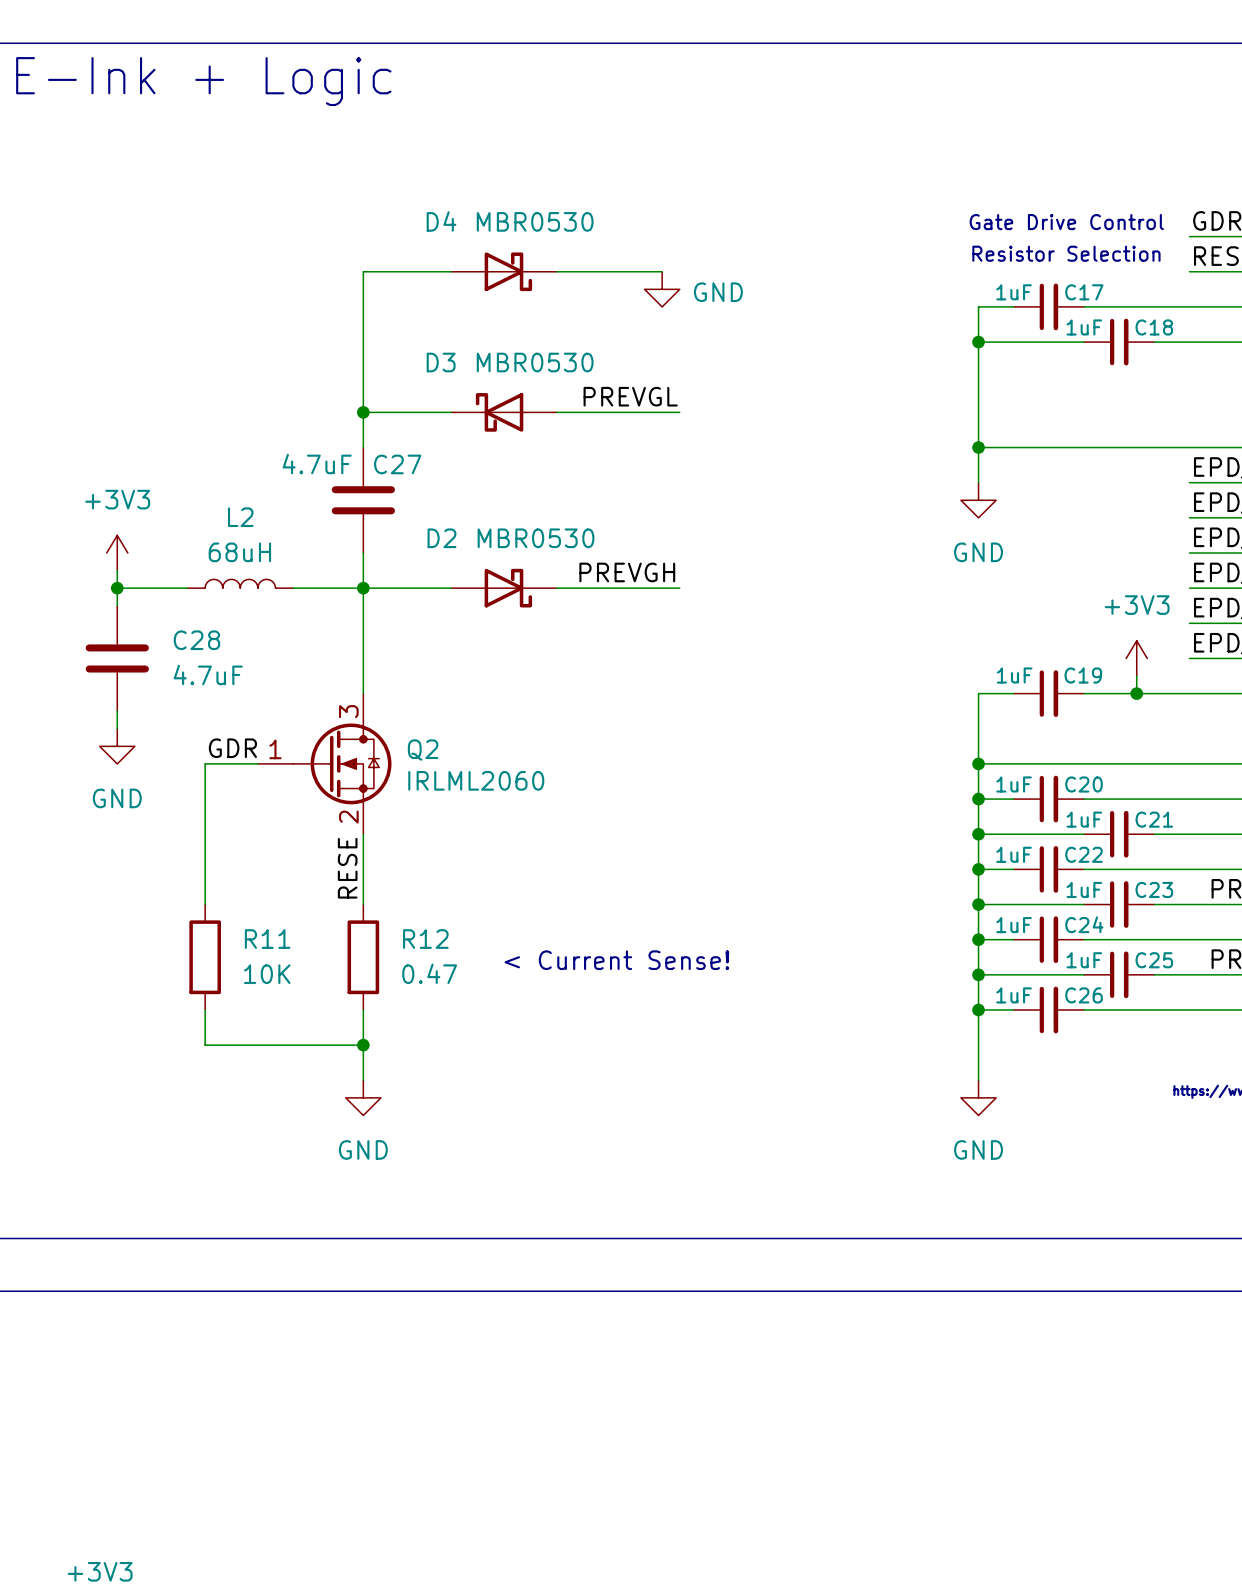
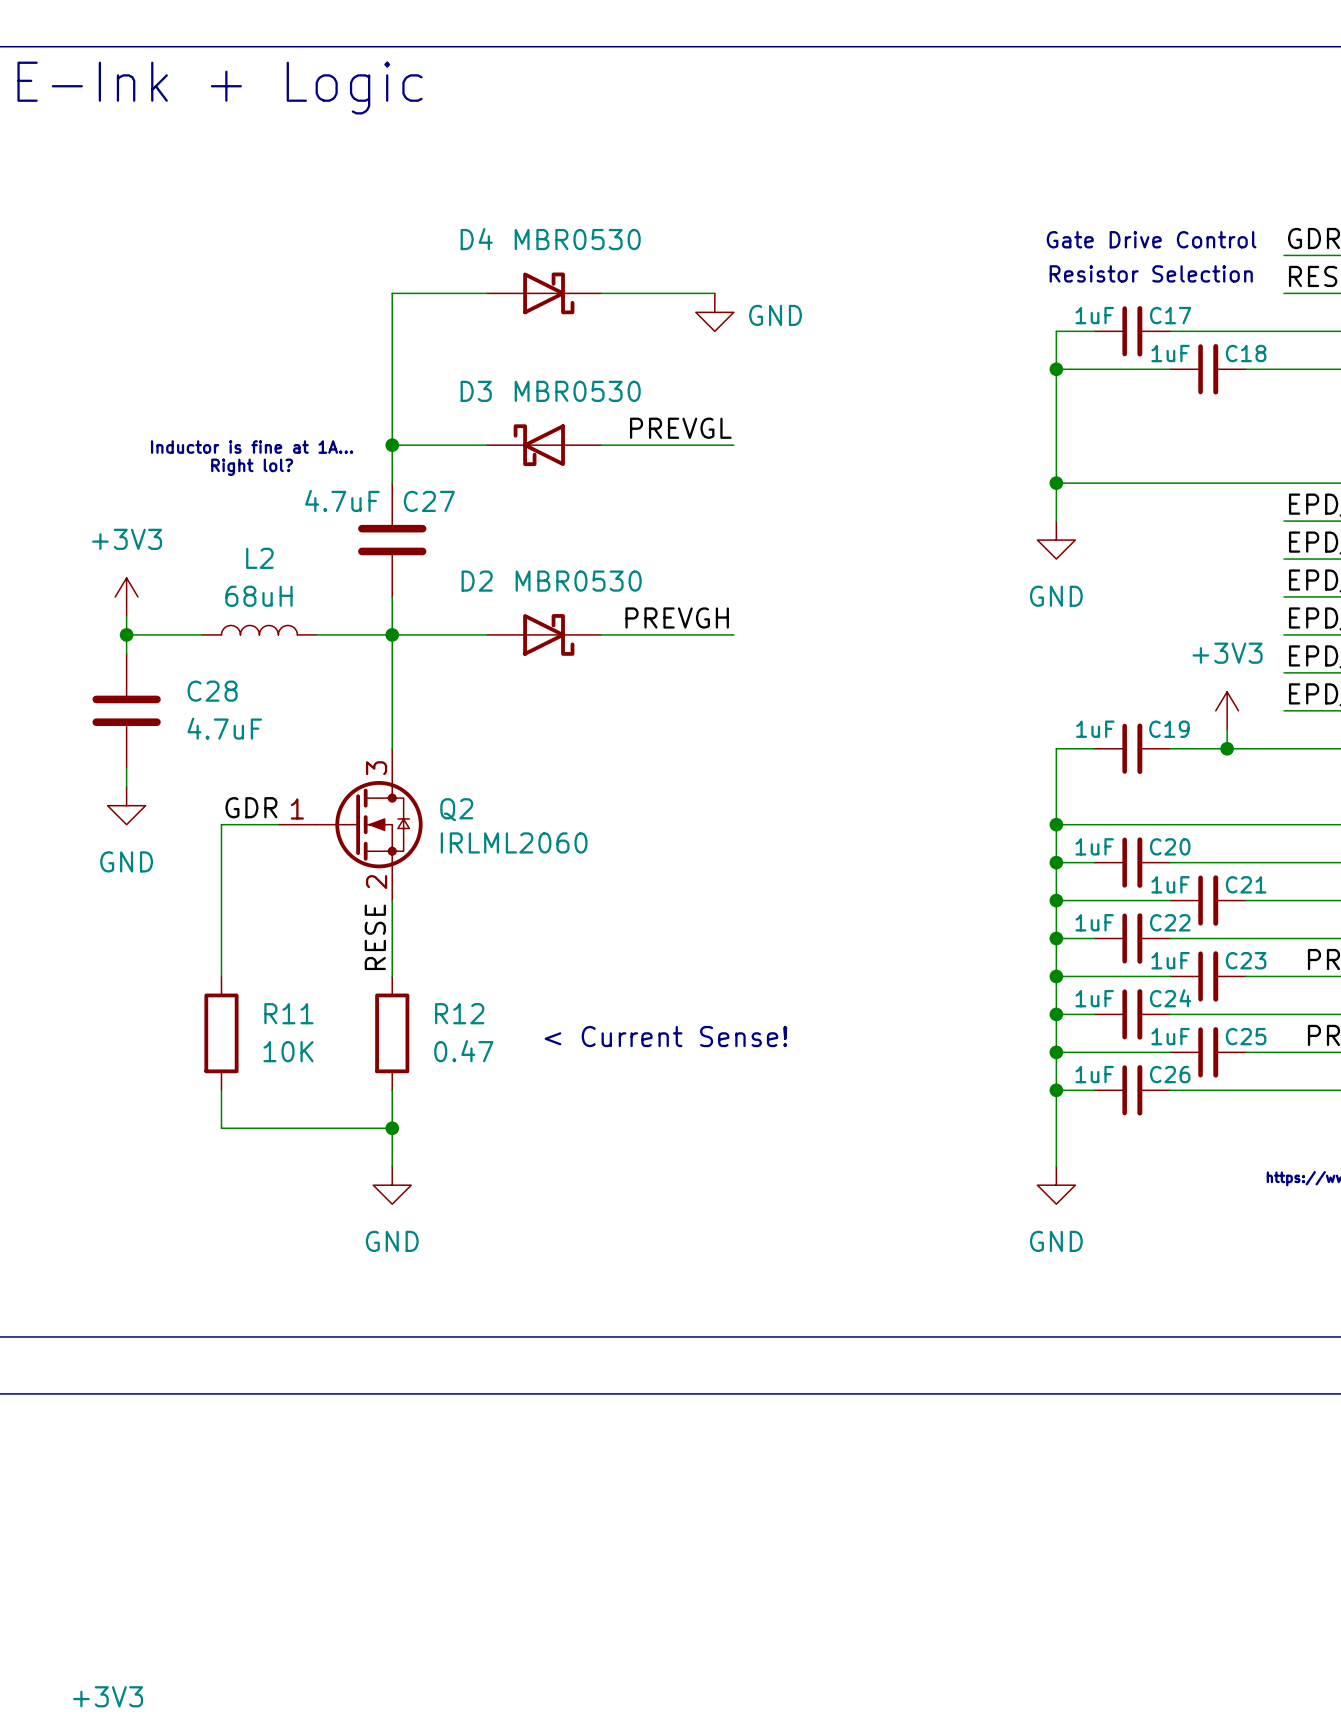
text: none -> Inductor is fine at 1A... (252, 447)
text: none -> Right lol? (252, 467)

